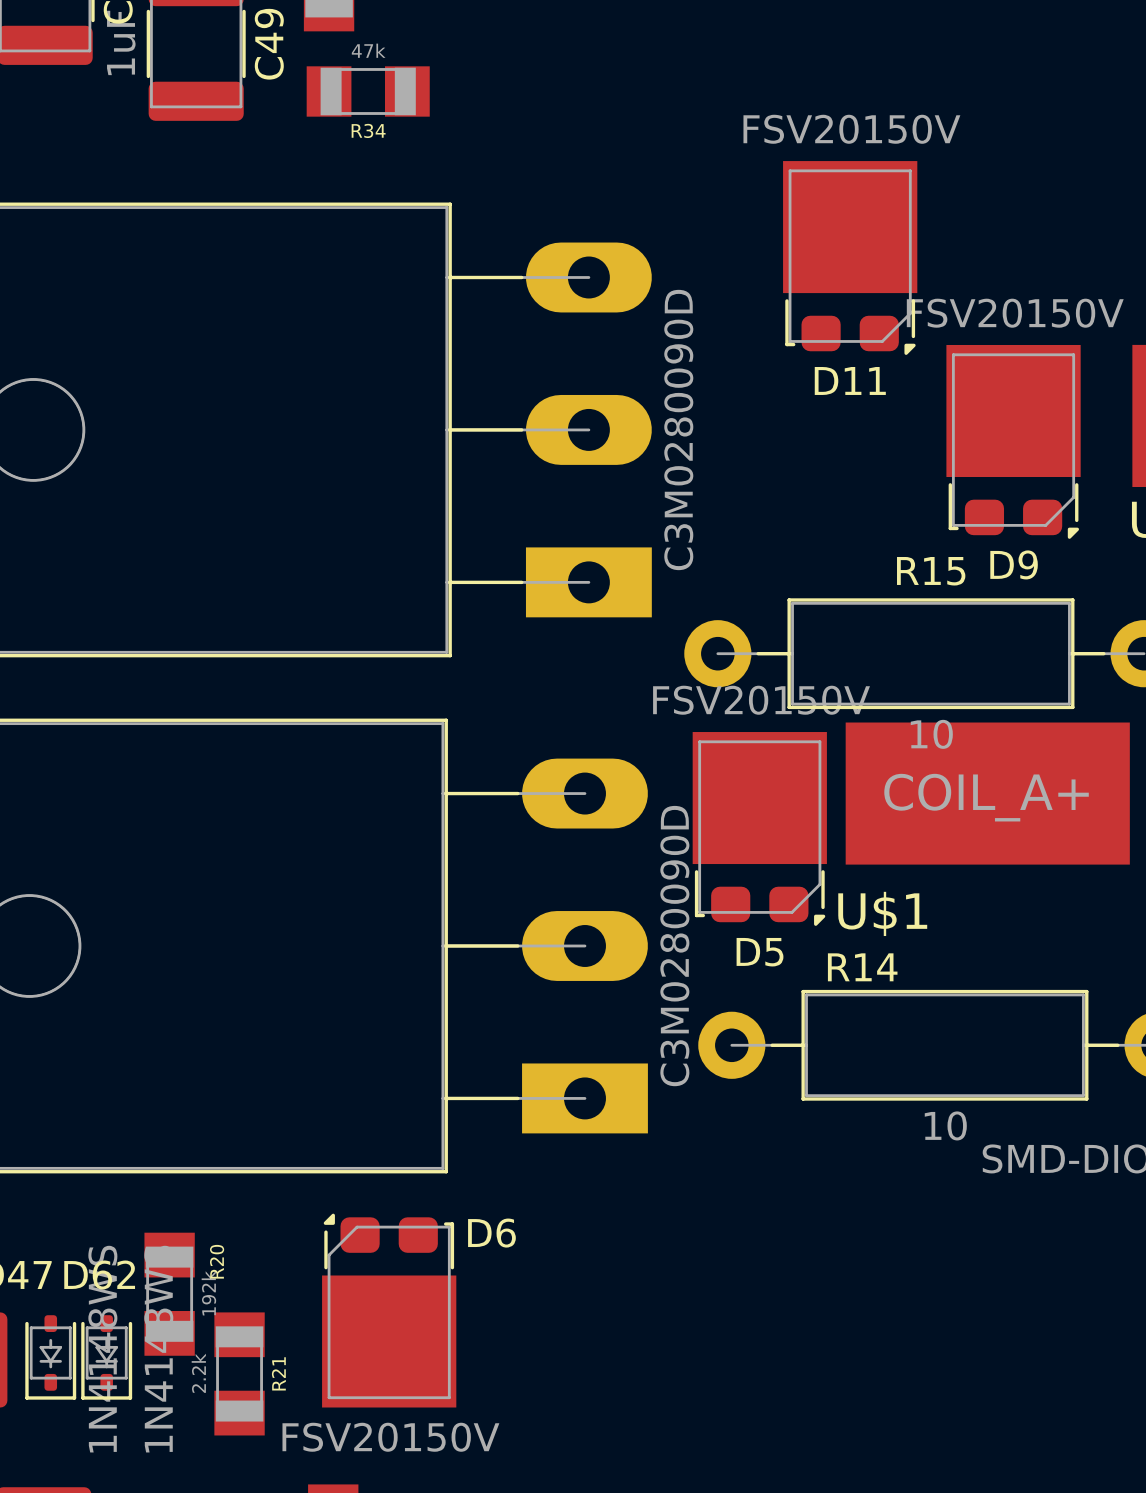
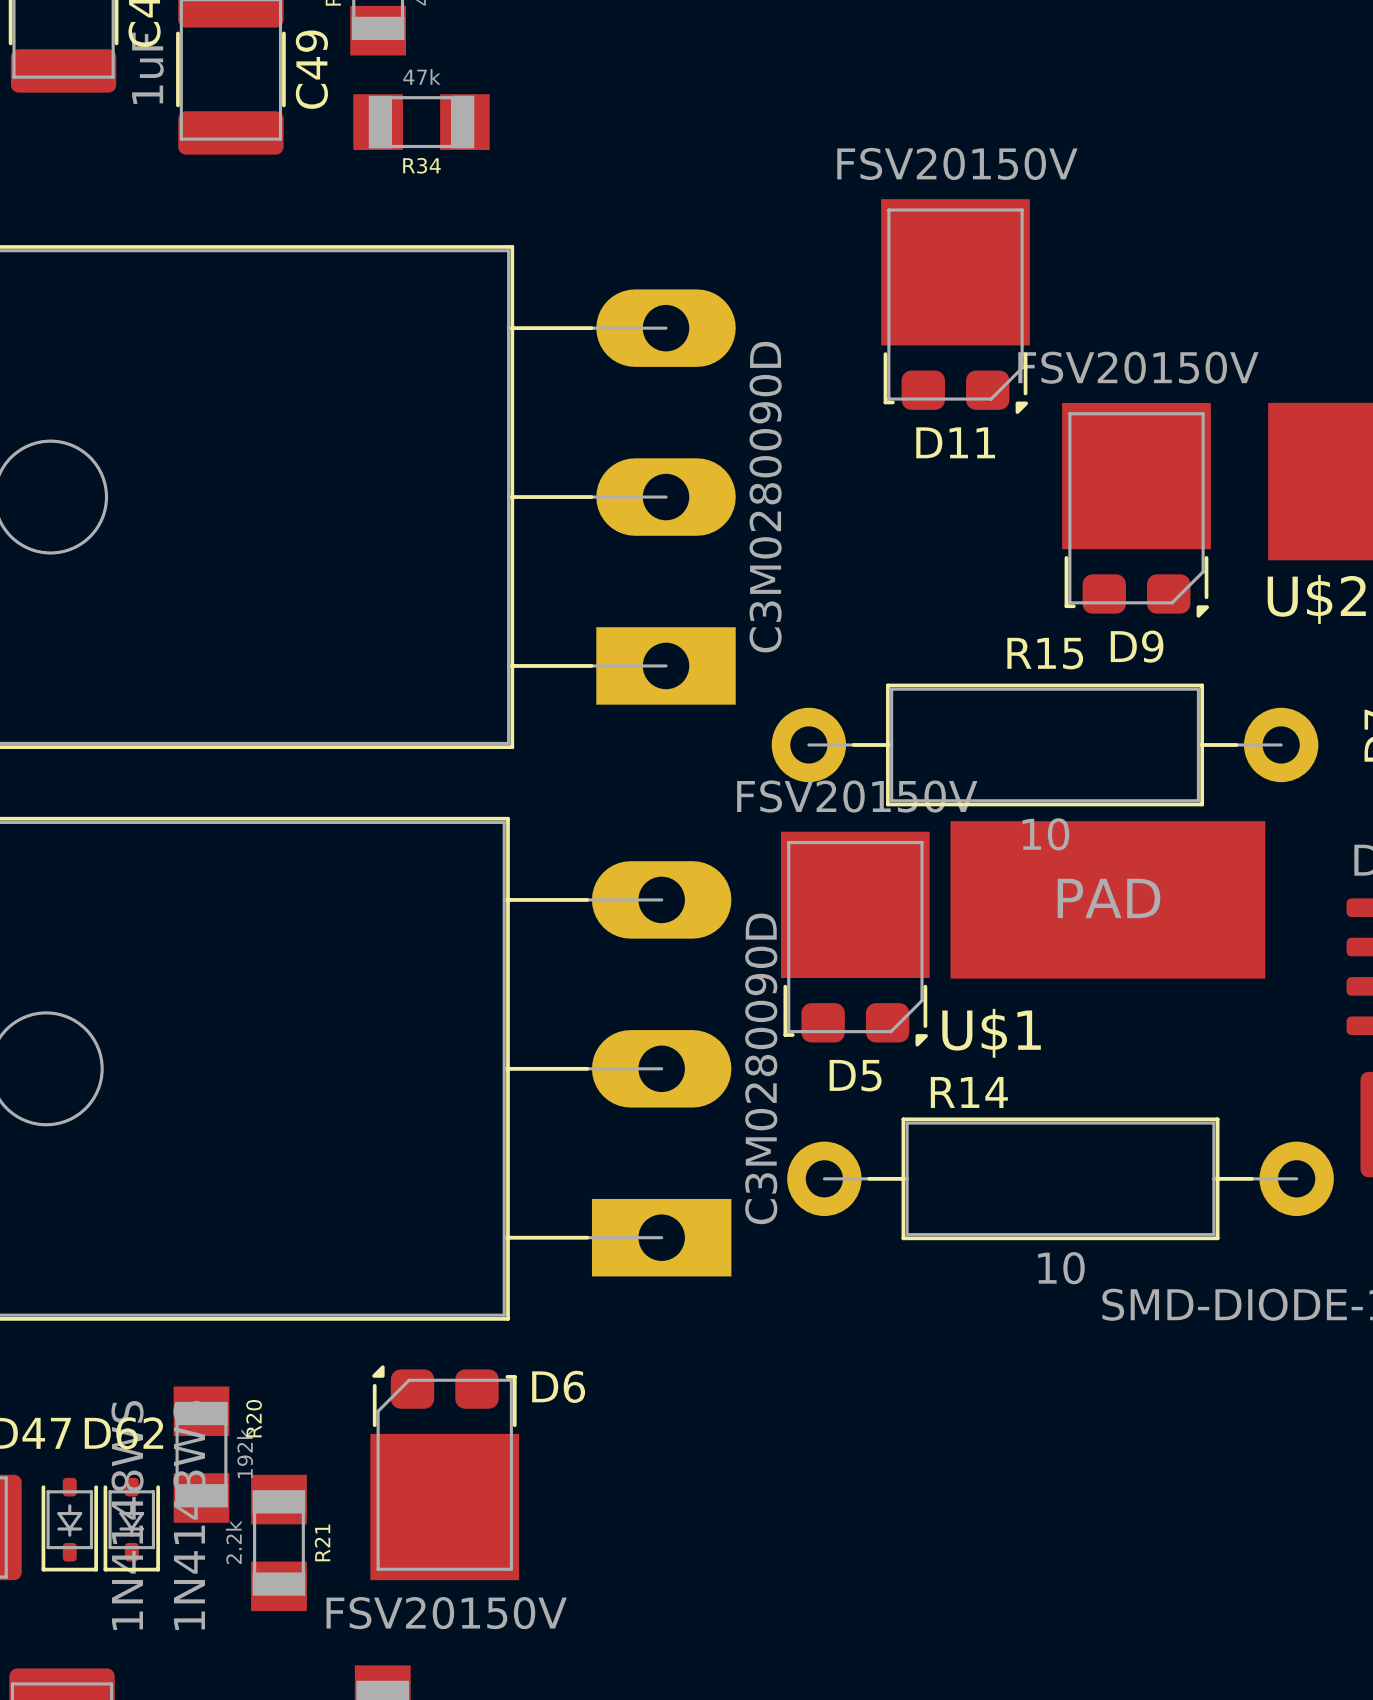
U$1 value: COIL_A+ (986, 797) -> PAD (1108, 898)

